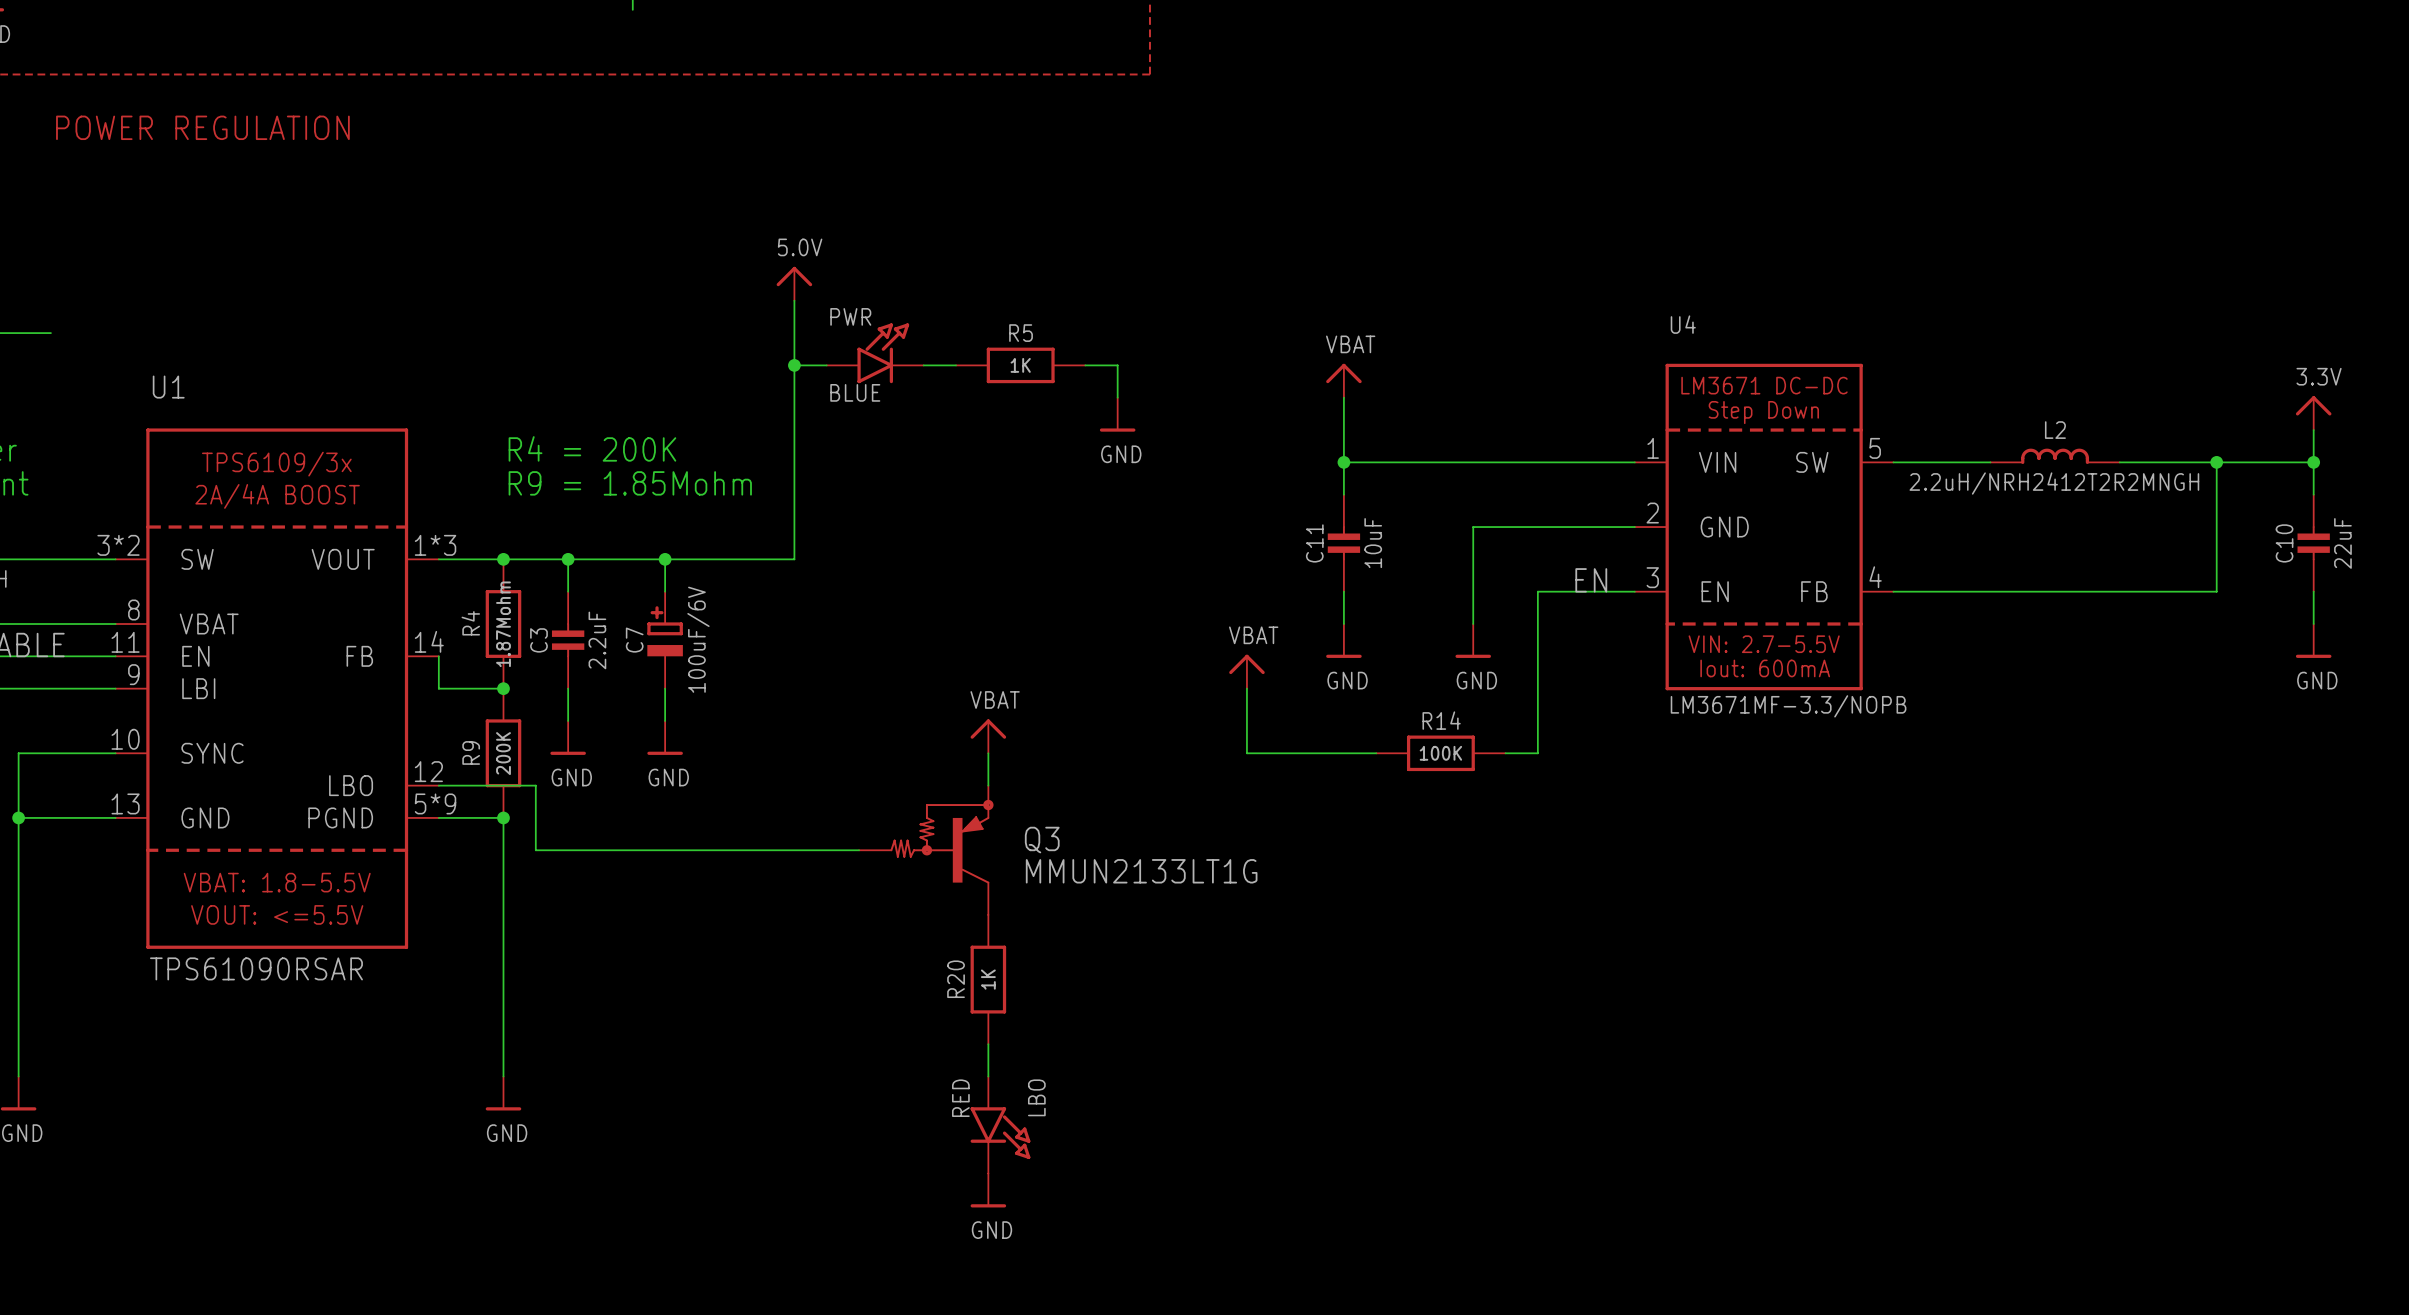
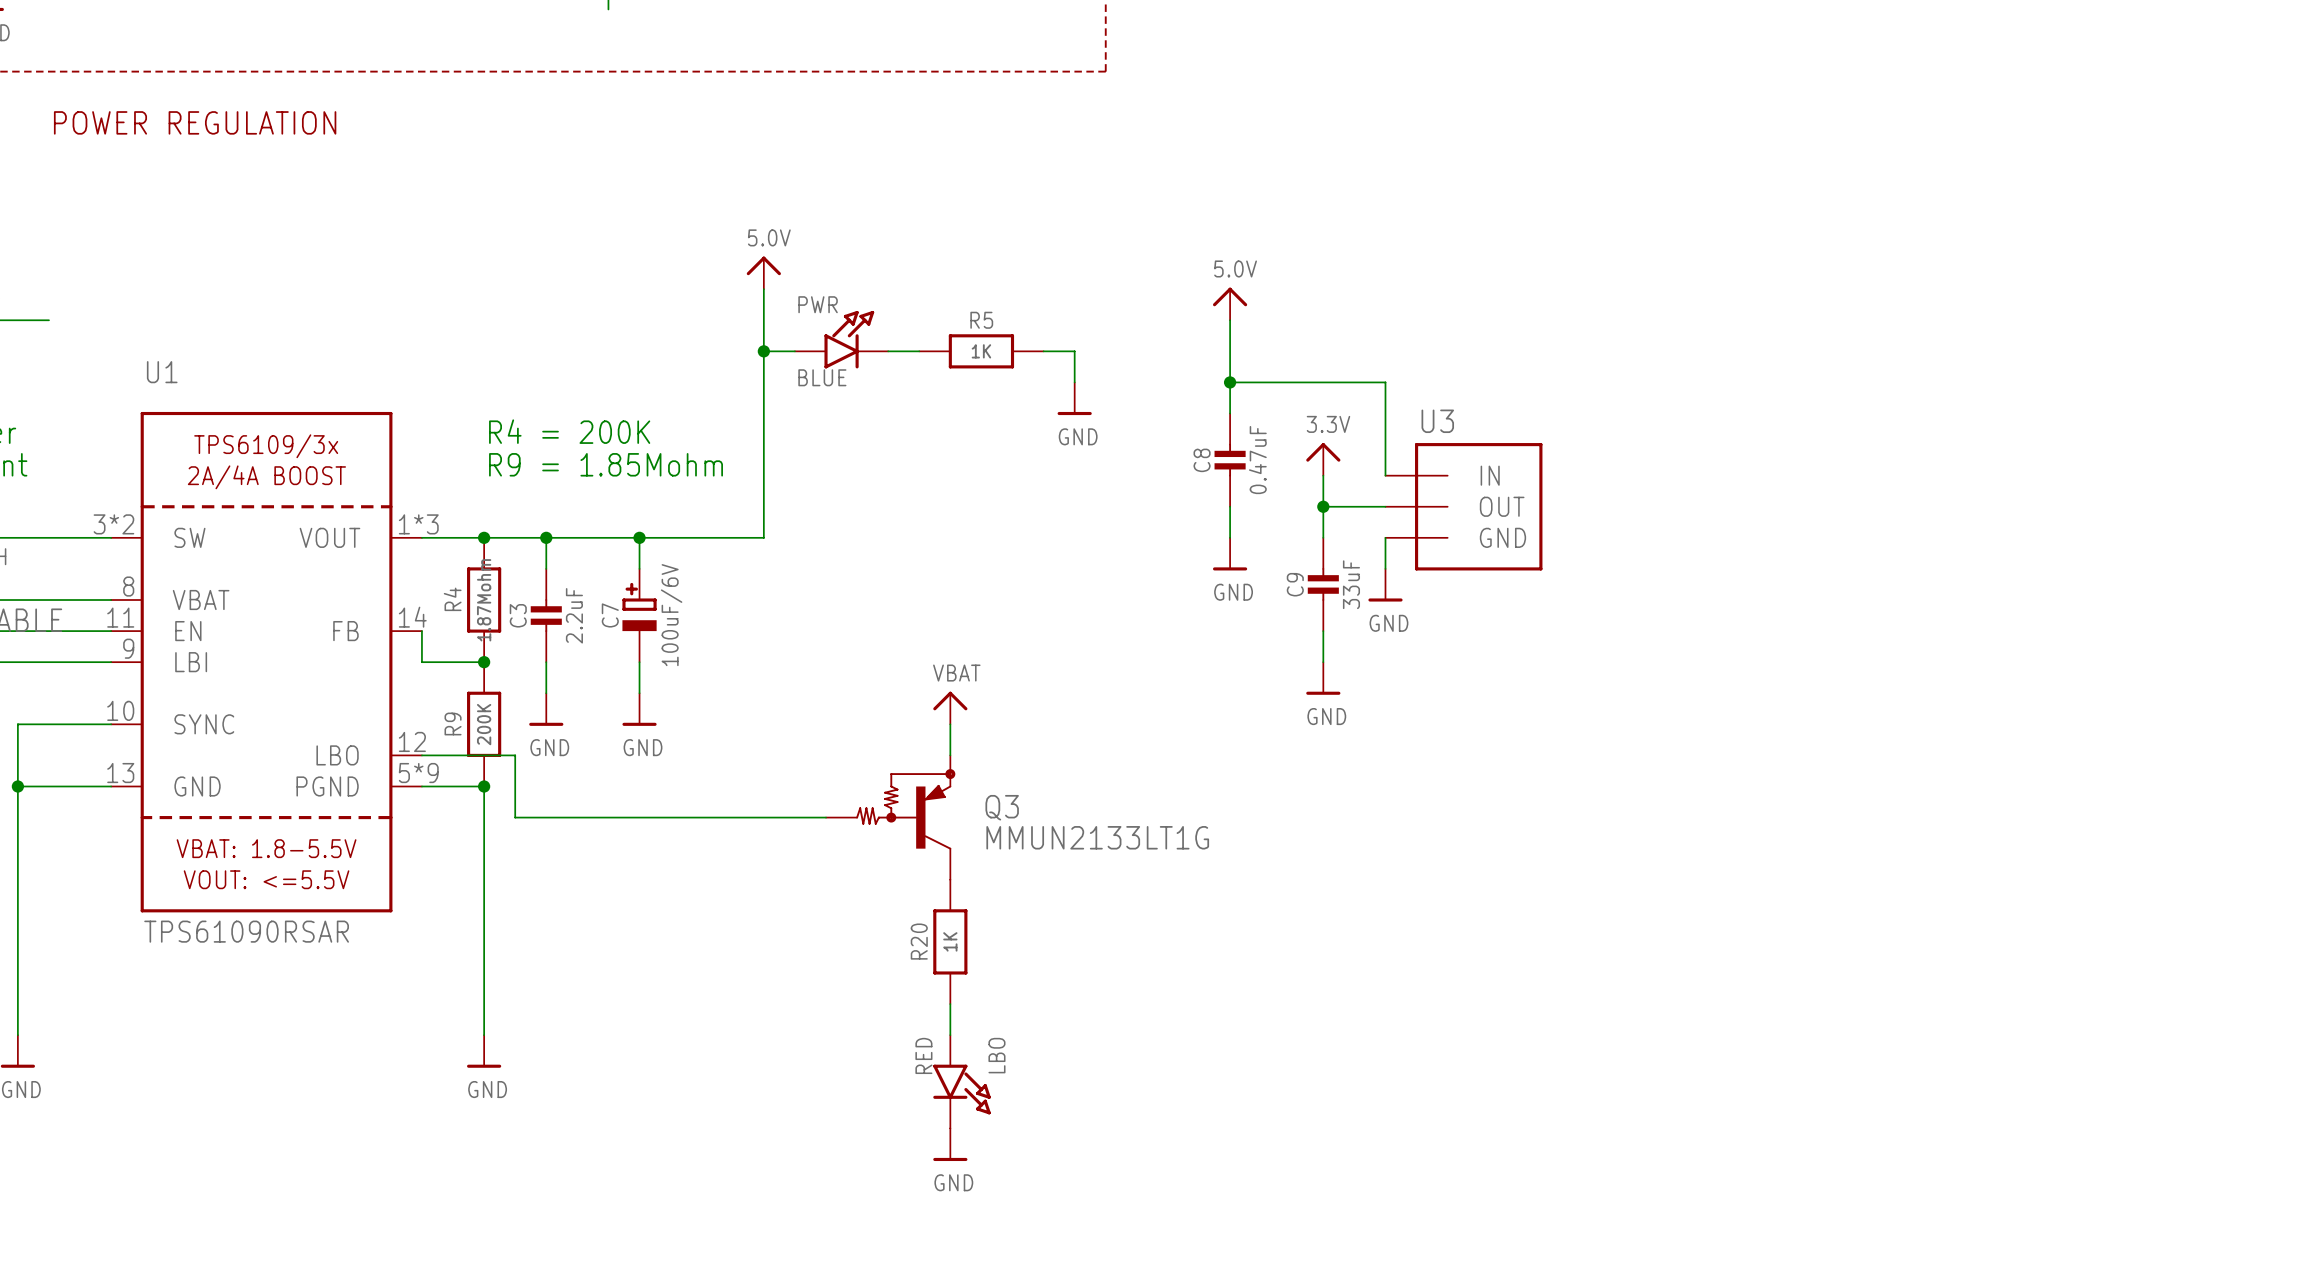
power symbol: none -> 5.0V (1230, 303)
power symbol: VBAT (1343, 380) -> none
wire: none -> (1230, 382) (1385, 382) (1385, 475)
junction: none -> (1230, 382)
wire: (1343, 397) (1343, 494) -> (1230, 320) (1230, 413)
power symbol: 3.3V (2313, 413) -> none
wire: (2313, 430) (2313, 494) -> none
L2: 2.2uH/NRH2412T2R2MNGH (2055, 456) -> none
wire: (1343, 462) (1634, 462) -> none
junction: (1343, 462) -> none
wire: (1893, 462) (1990, 462) -> none
wire: (2119, 462) (2313, 462) -> none
wire: (2216, 462) (2216, 591) (1893, 591) -> none
junction: (2216, 462) -> none
junction: (2313, 462) -> none
power symbol: none -> 3.3V (1323, 459)
C8: none -> 0.47uF (1230, 460)
wire: none -> (1323, 475) (1323, 537)
wire: none -> (1323, 506) (1385, 506)
junction: none -> (1323, 506)
U3: none -> (1463, 506)
wire: (1634, 527) (1473, 527) (1473, 624) -> none
U4: LM3671MF-3.3/NOPB (1764, 527) -> none
C11: 10uF (1343, 543) -> none
C10: 22uF (2313, 543) -> none
wire: none -> (1385, 537) (1385, 568)
power symbol: none -> GND (1230, 554)
label: EN (1591, 580) -> none
wire: (1343, 591) (1343, 624) -> (1230, 506) (1230, 537)
wire: (1634, 591) (1537, 591) (1537, 753) (1505, 753) -> none
wire: (2313, 591) (2313, 624) -> none
C9: none -> 33uF (1323, 584)
power symbol: GND (1343, 640) -> none
power symbol position: GND (1473, 640) -> GND (1385, 585)
power symbol: GND (2313, 640) -> none
wire: none -> (1323, 631) (1323, 662)
power symbol: VBAT (1246, 671) -> none
wire: (1246, 688) (1246, 753) (1376, 753) -> none
power symbol: none -> GND (1323, 678)
R14: 100K (1440, 753) -> none

